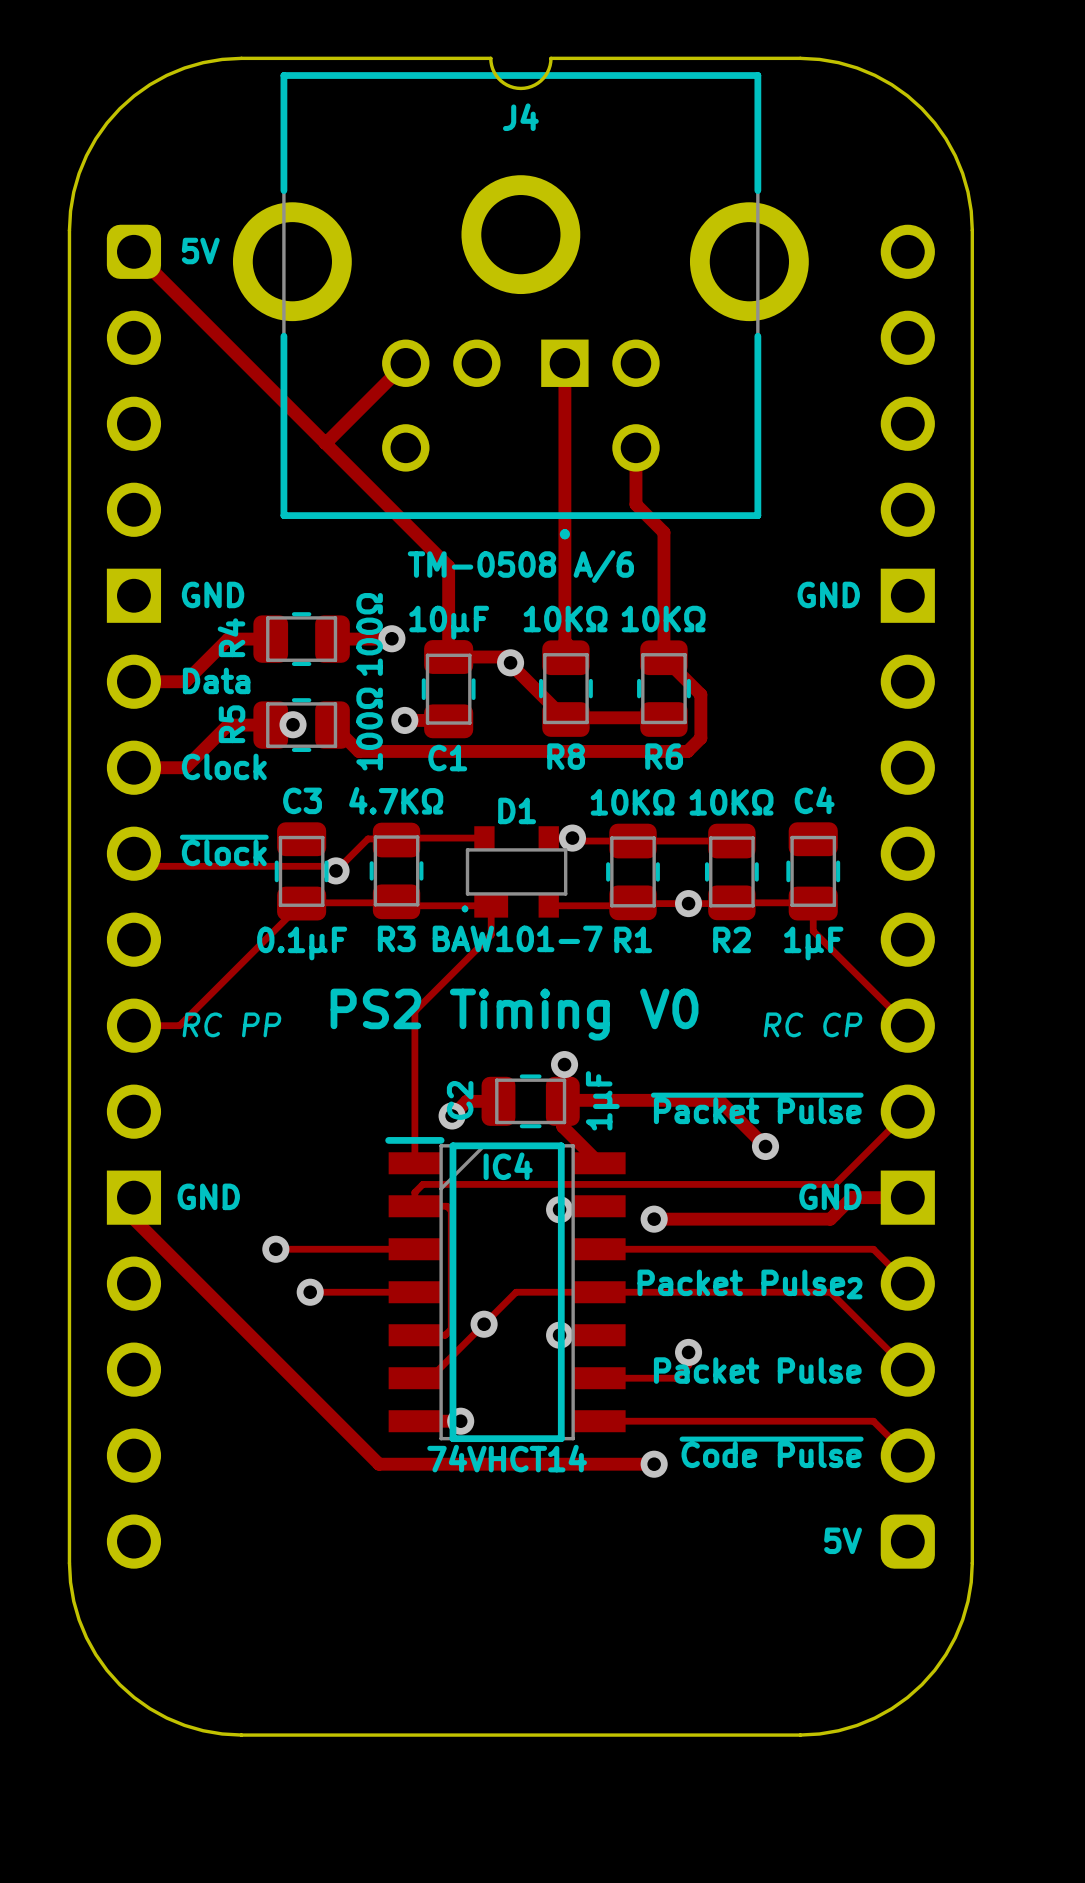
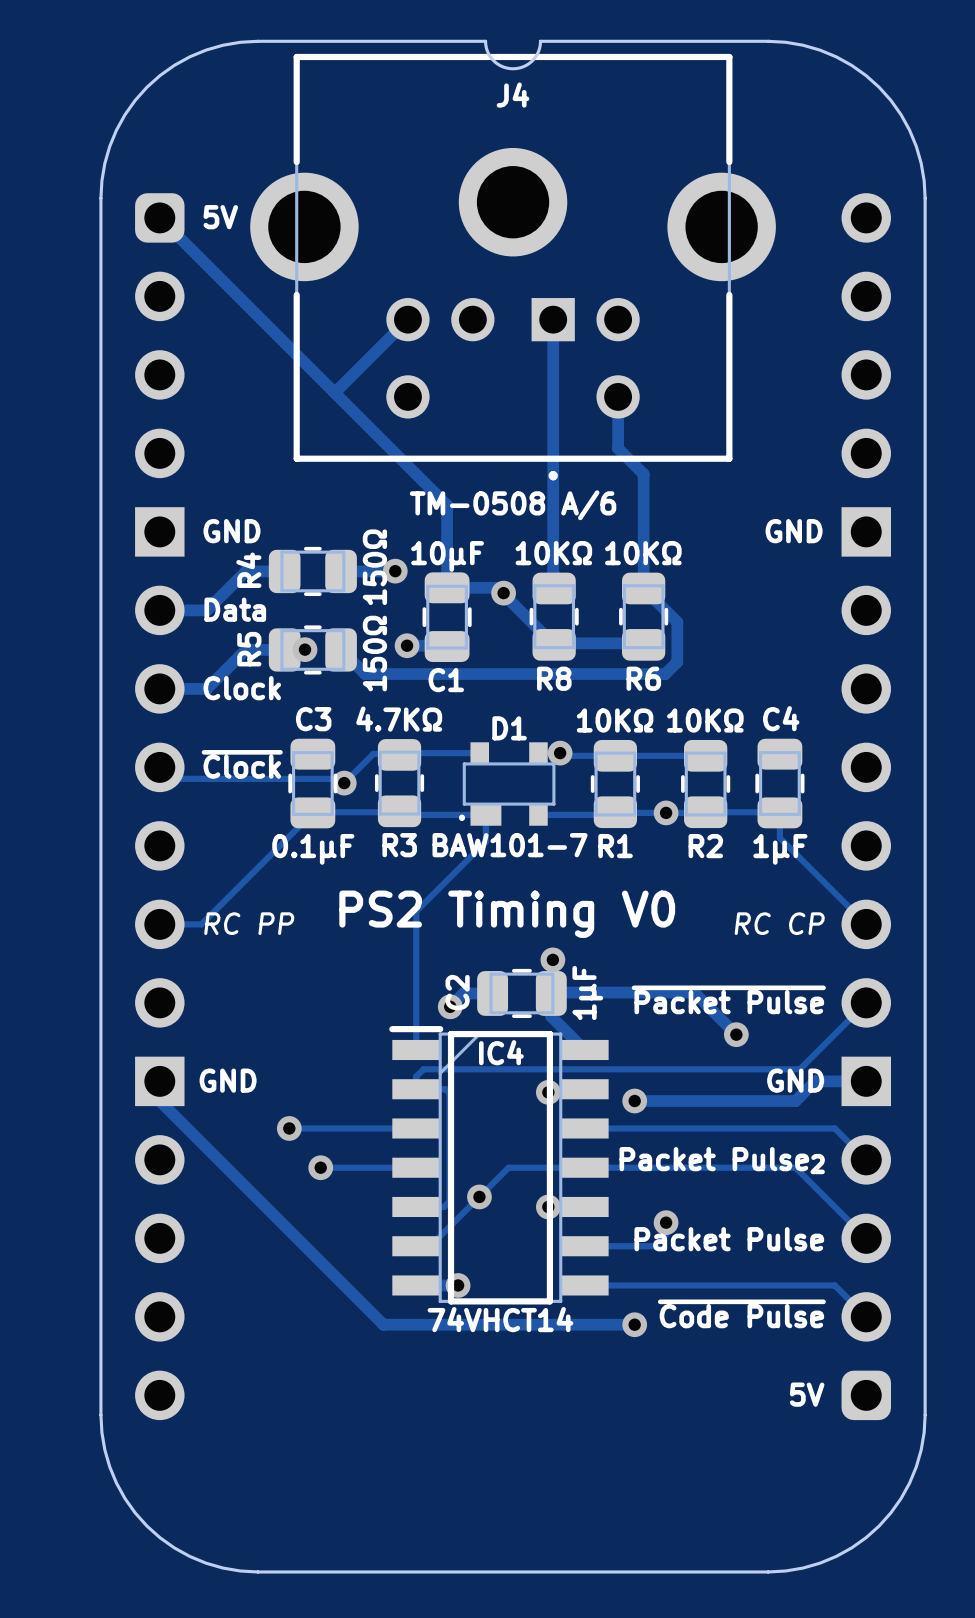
R4 value: 100Ω (369, 634) -> 150Ω (374, 567)
R5 value: 100Ω (369, 729) -> 150Ω (374, 653)

